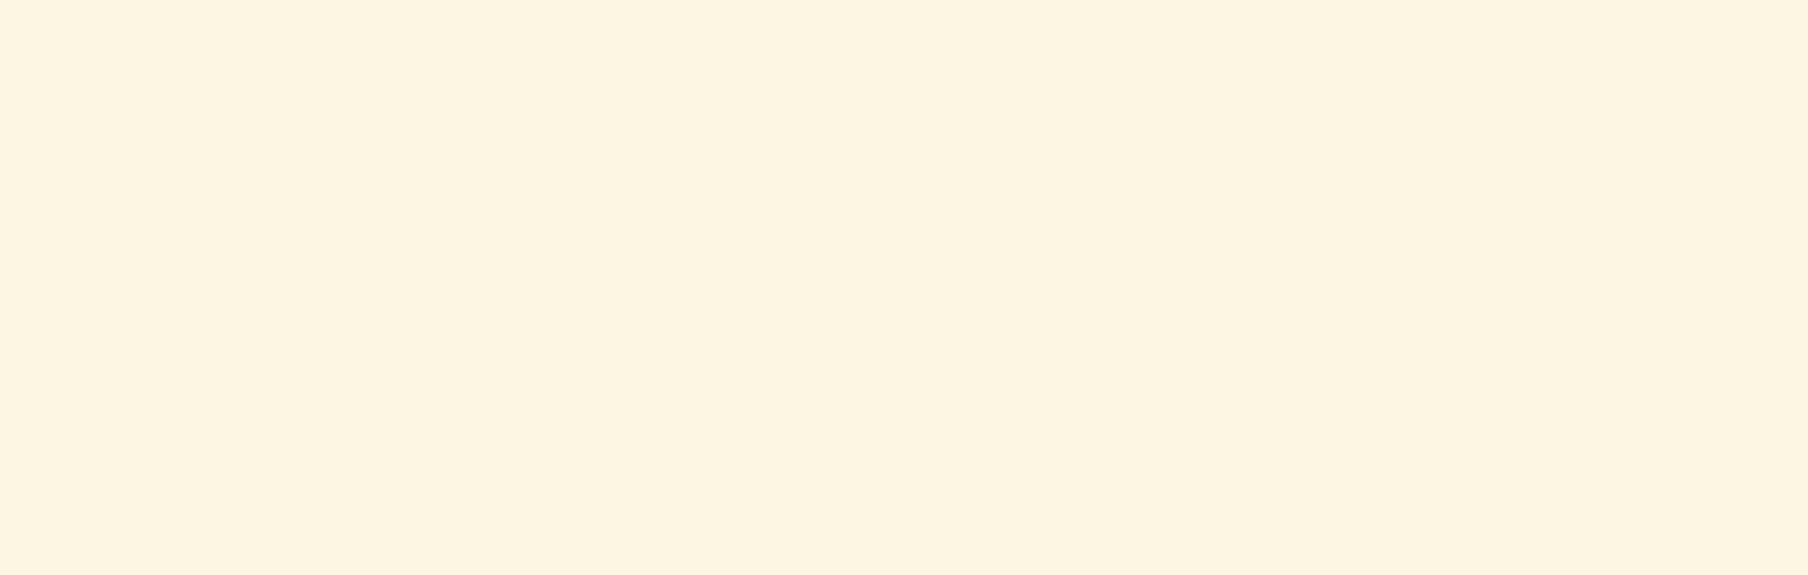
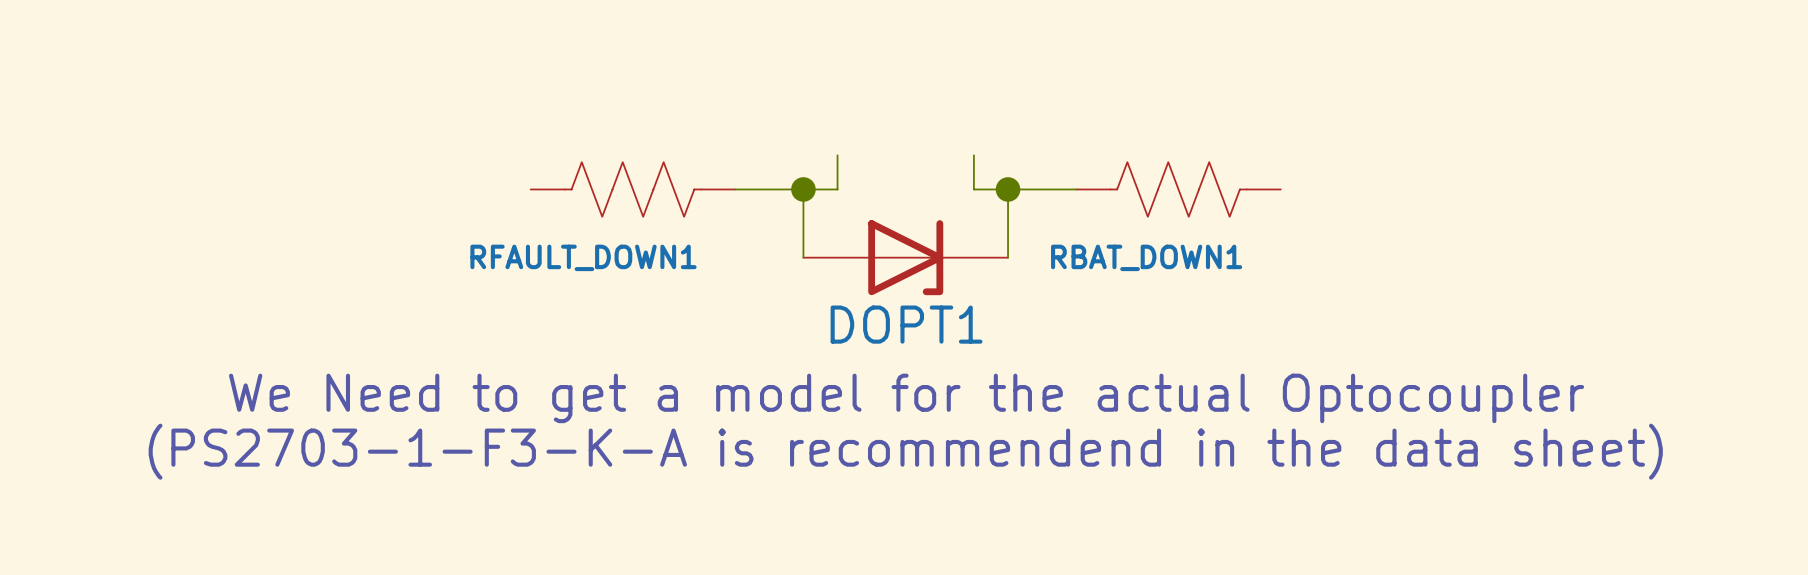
wire: none -> (837, 155) (837, 189) (735, 189)
wire: none -> (973, 155) (973, 189) (1076, 189)
RFAULT_DOWN1: none -> (632, 189)
wire: none -> (803, 189) (803, 257)
junction: none -> (803, 189)
wire: none -> (1008, 189) (1008, 257)
junction: none -> (1008, 189)
RBAT_DOWN1: none -> (1178, 189)
DOPT1: none -> (905, 257)
text: none -> We Need to get a model for the actual Optocoupler (906, 398)
text: none -> (PS2703-1-F3-K-A is recommendend in the data sheet) (905, 451)

